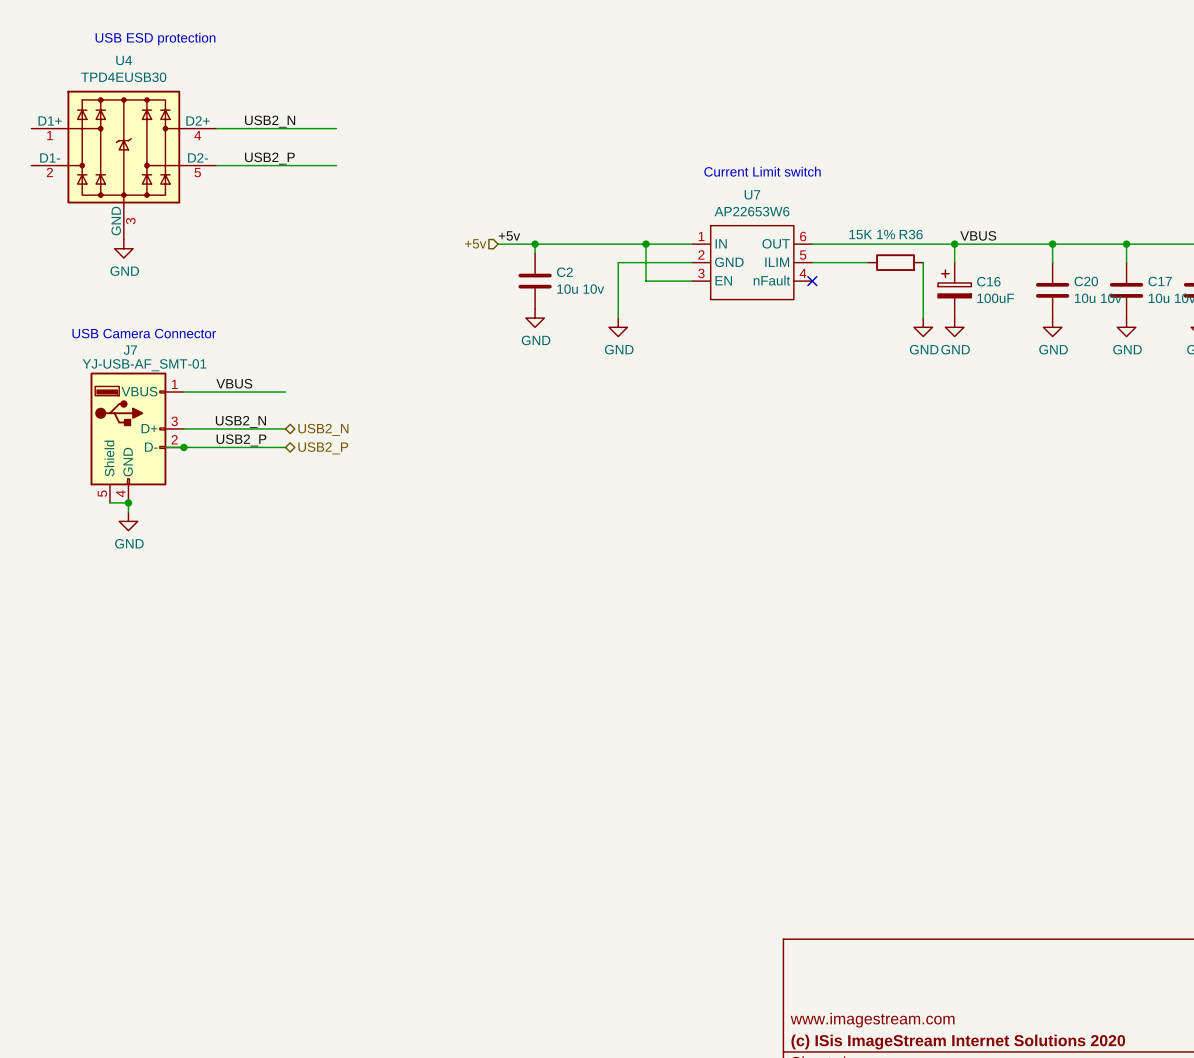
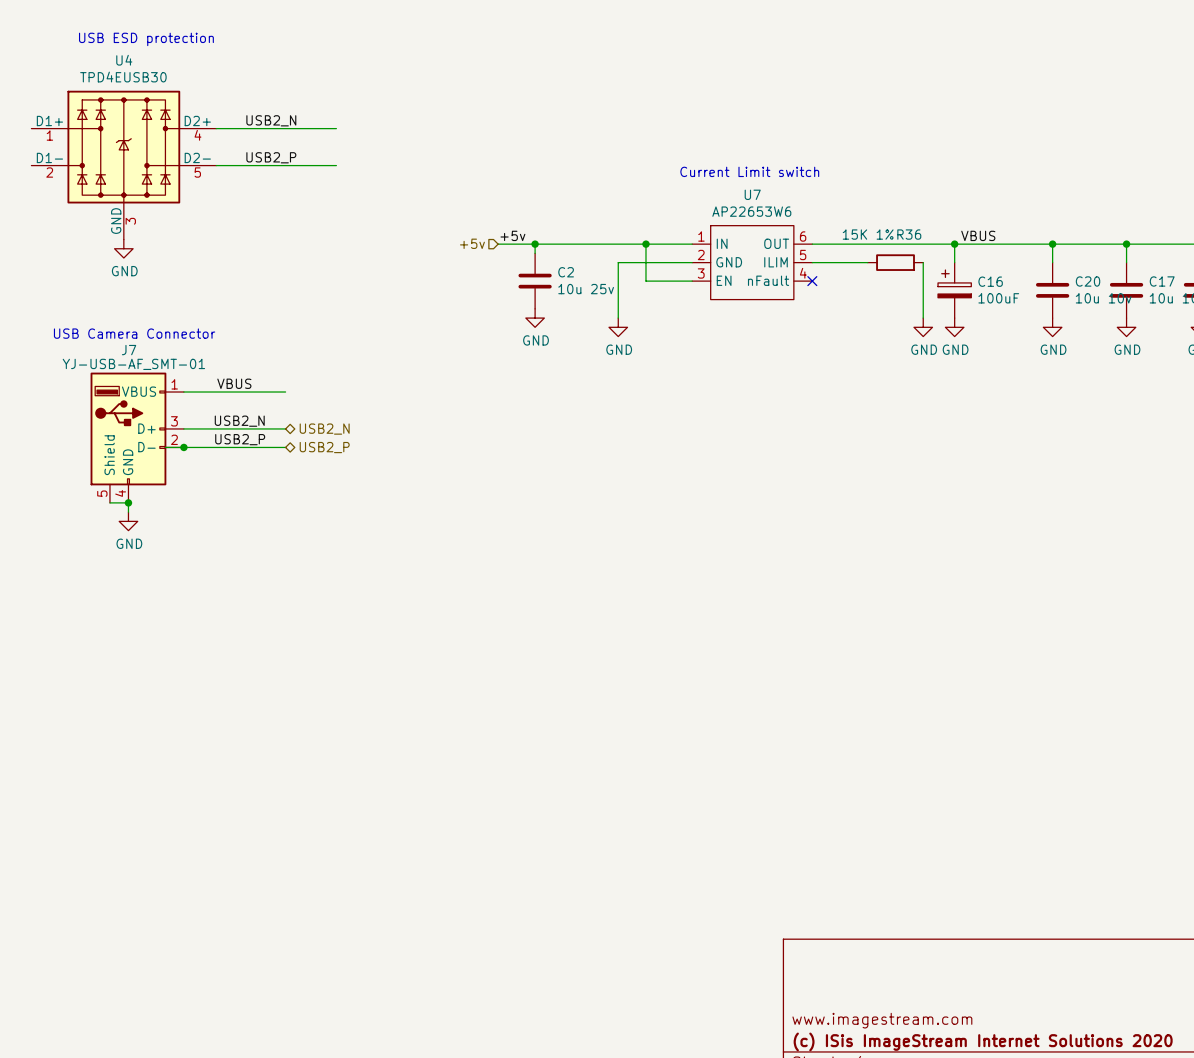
C2 value: 10u 10v (580, 289) -> 10u 25v (586, 289)

